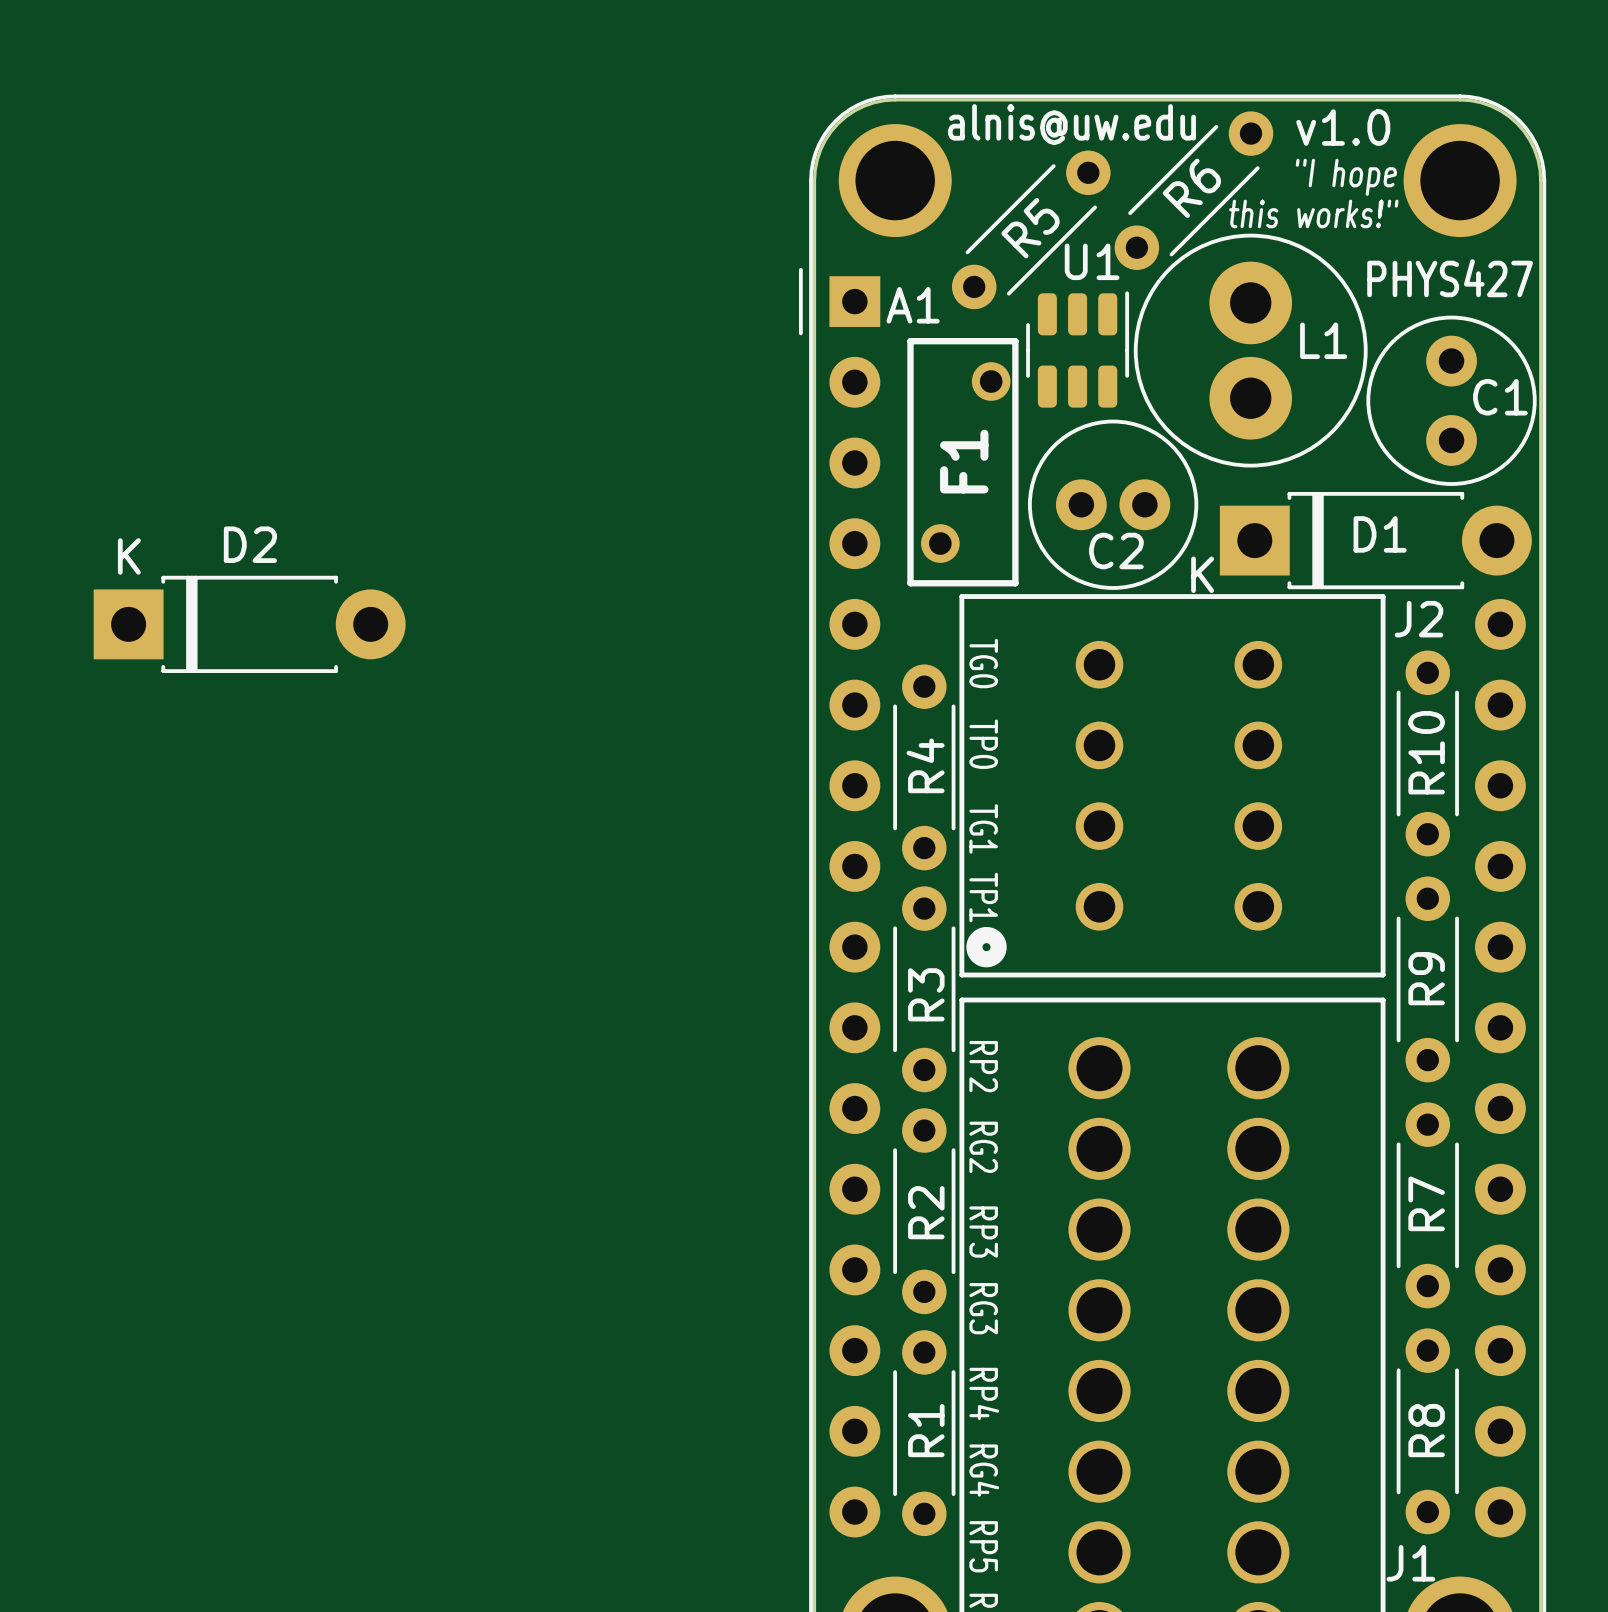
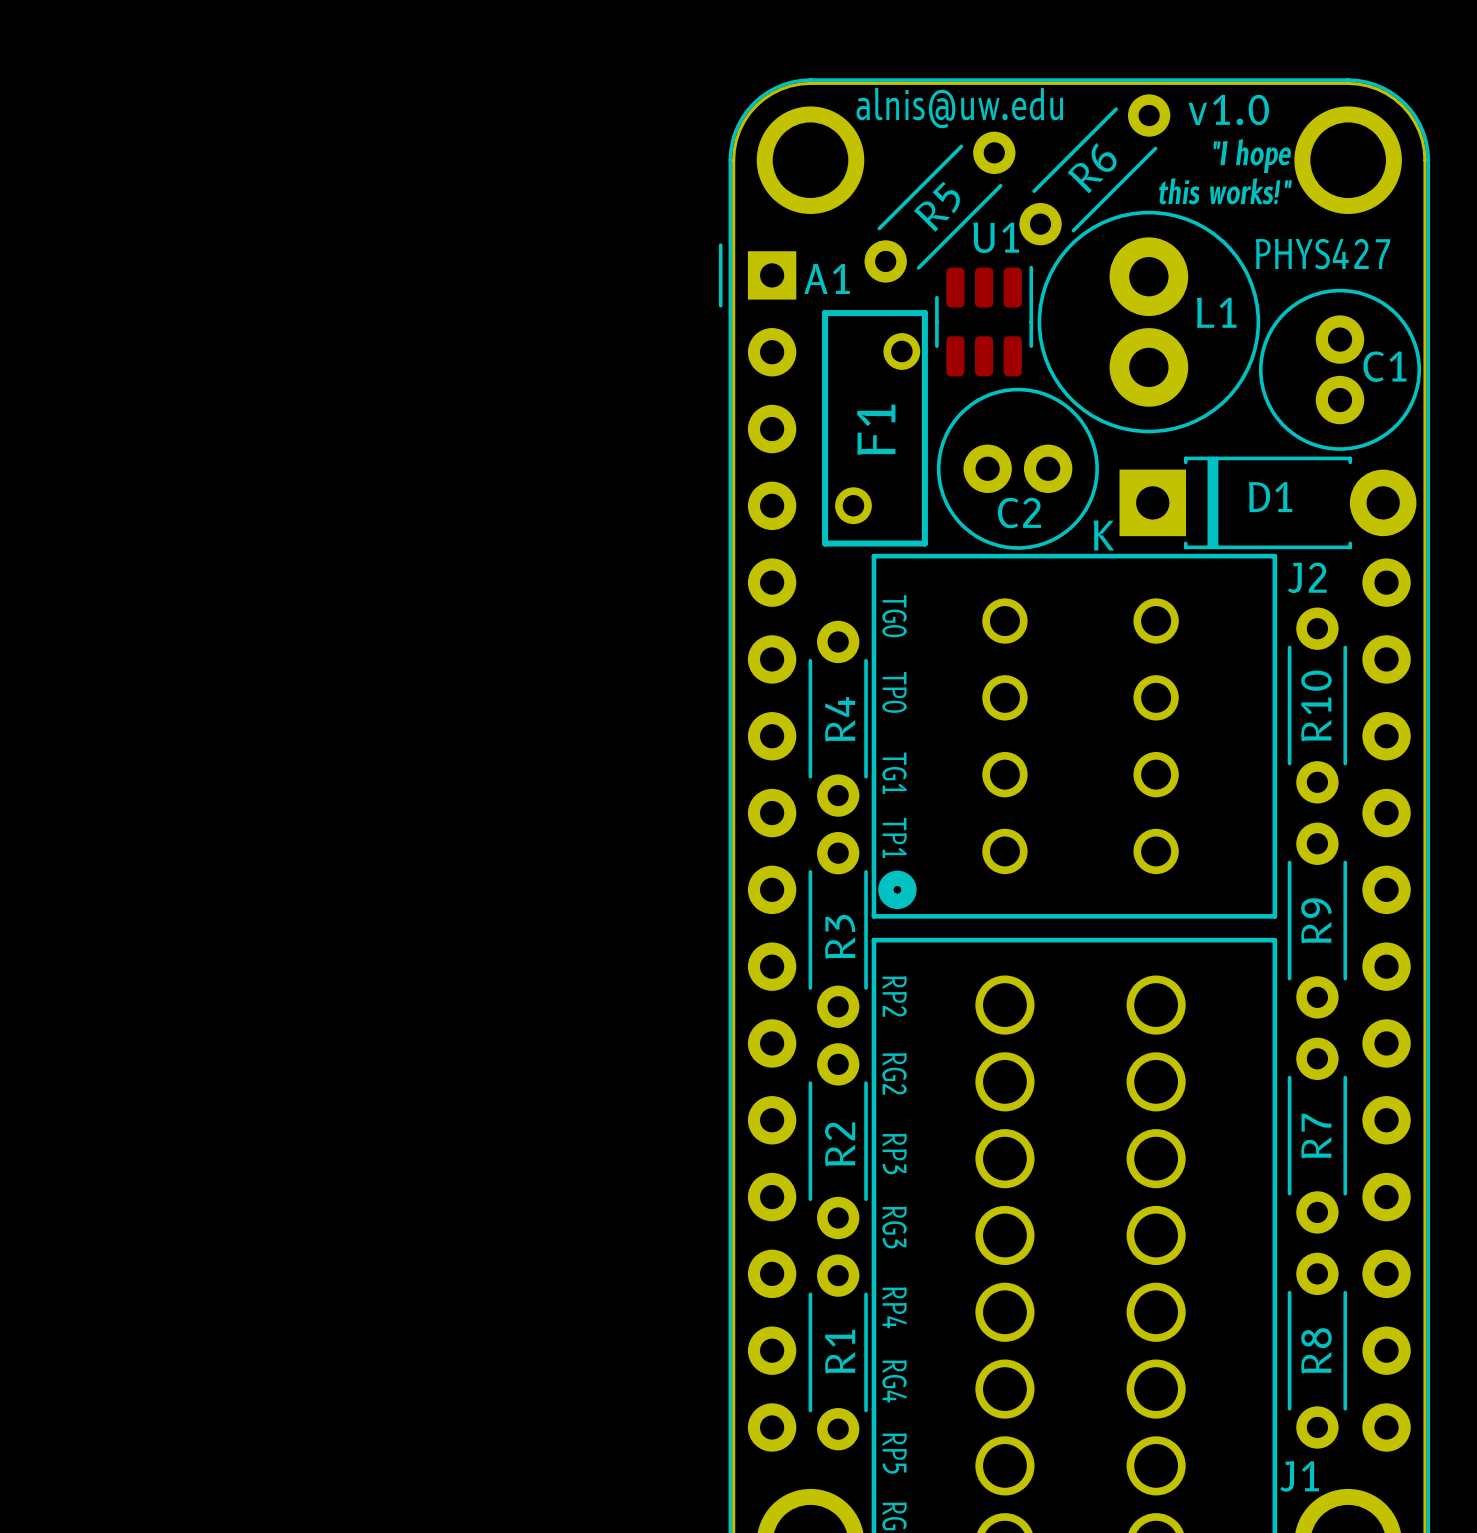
C1 footprint: [1366, 315, 1537, 486] -> [1258, 288, 1422, 451]
D2: (249, 624) -> none

